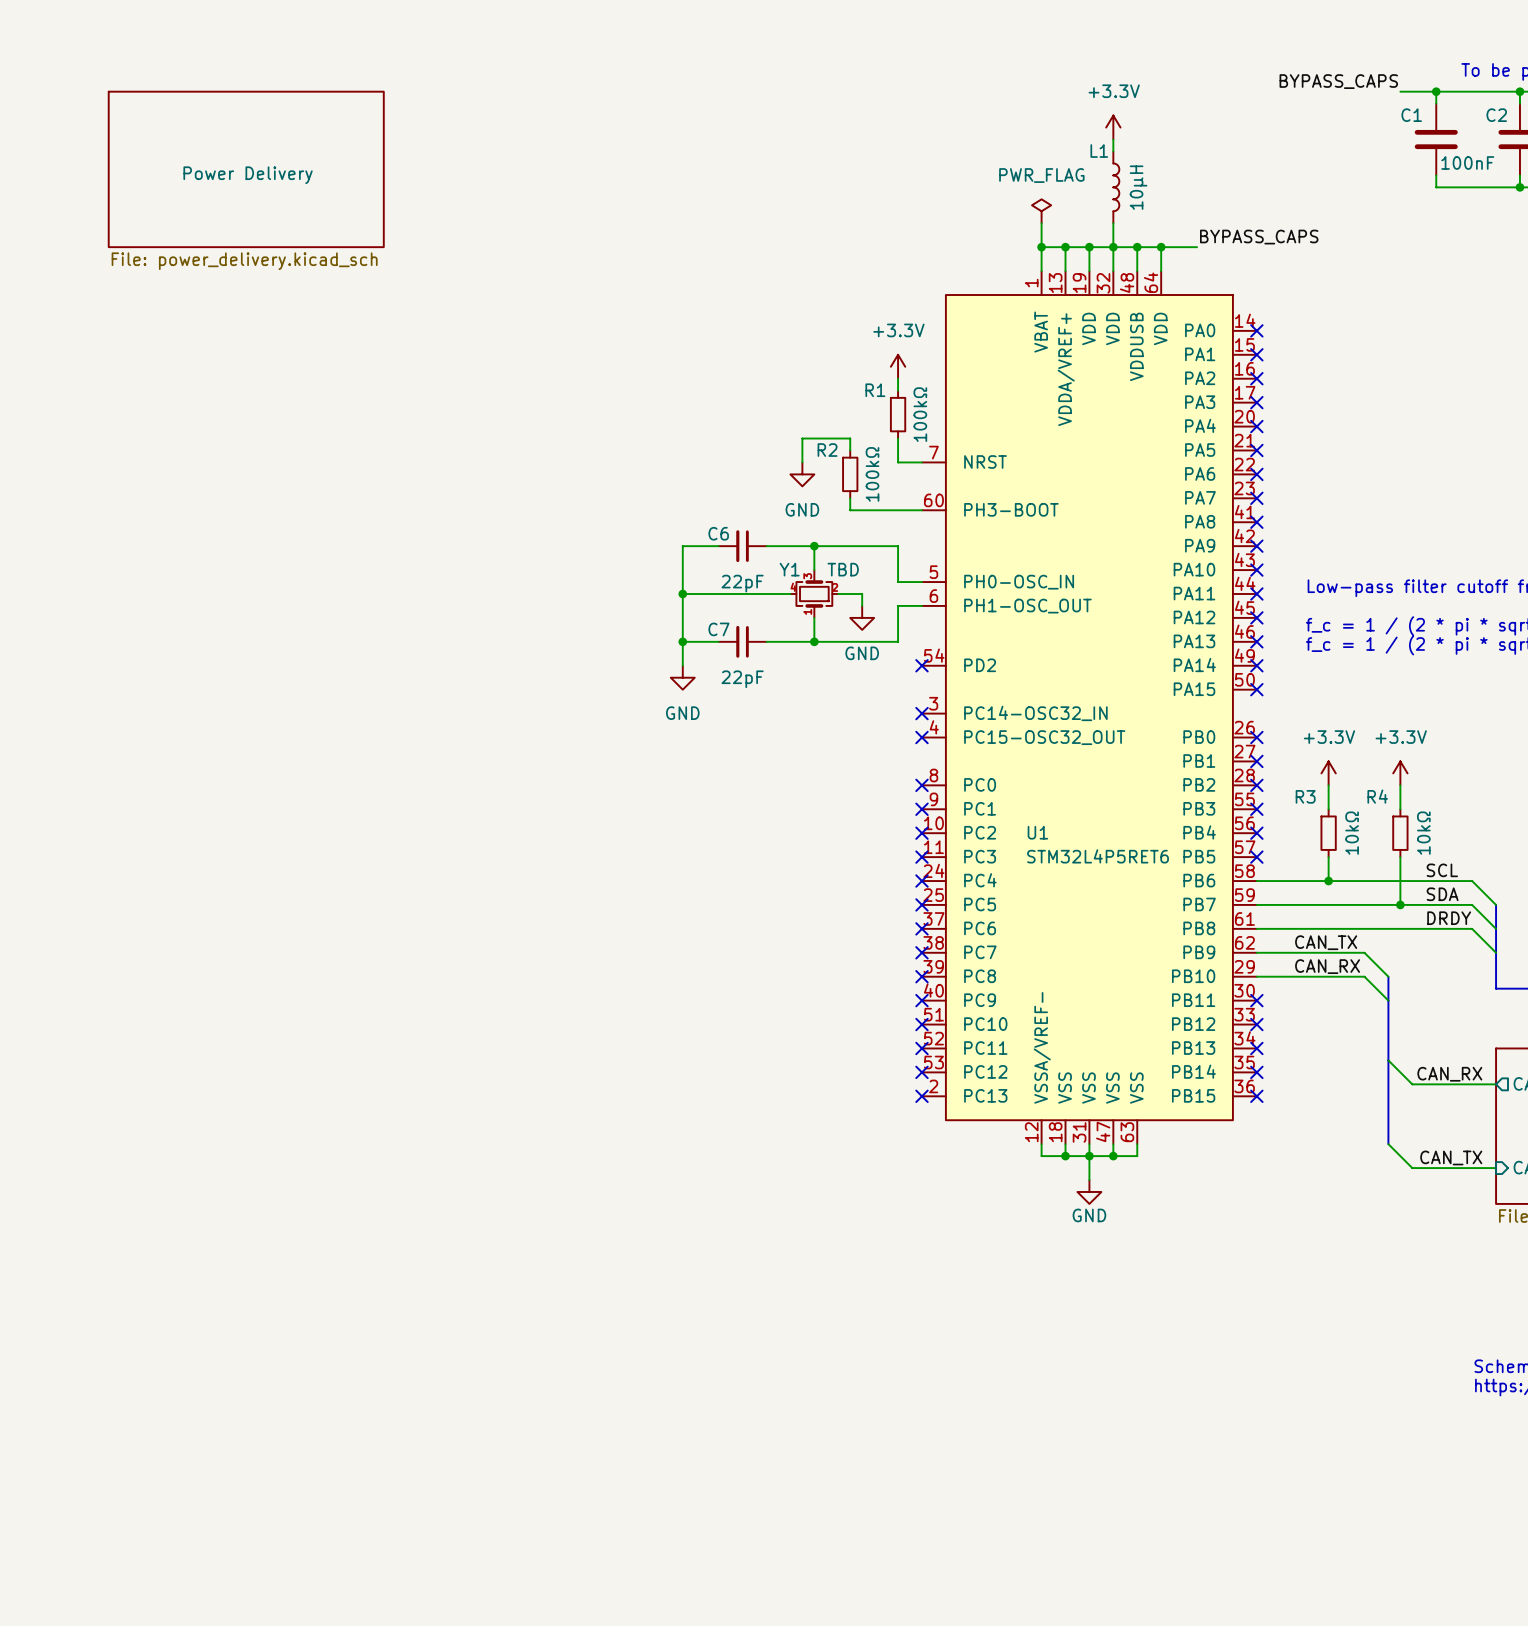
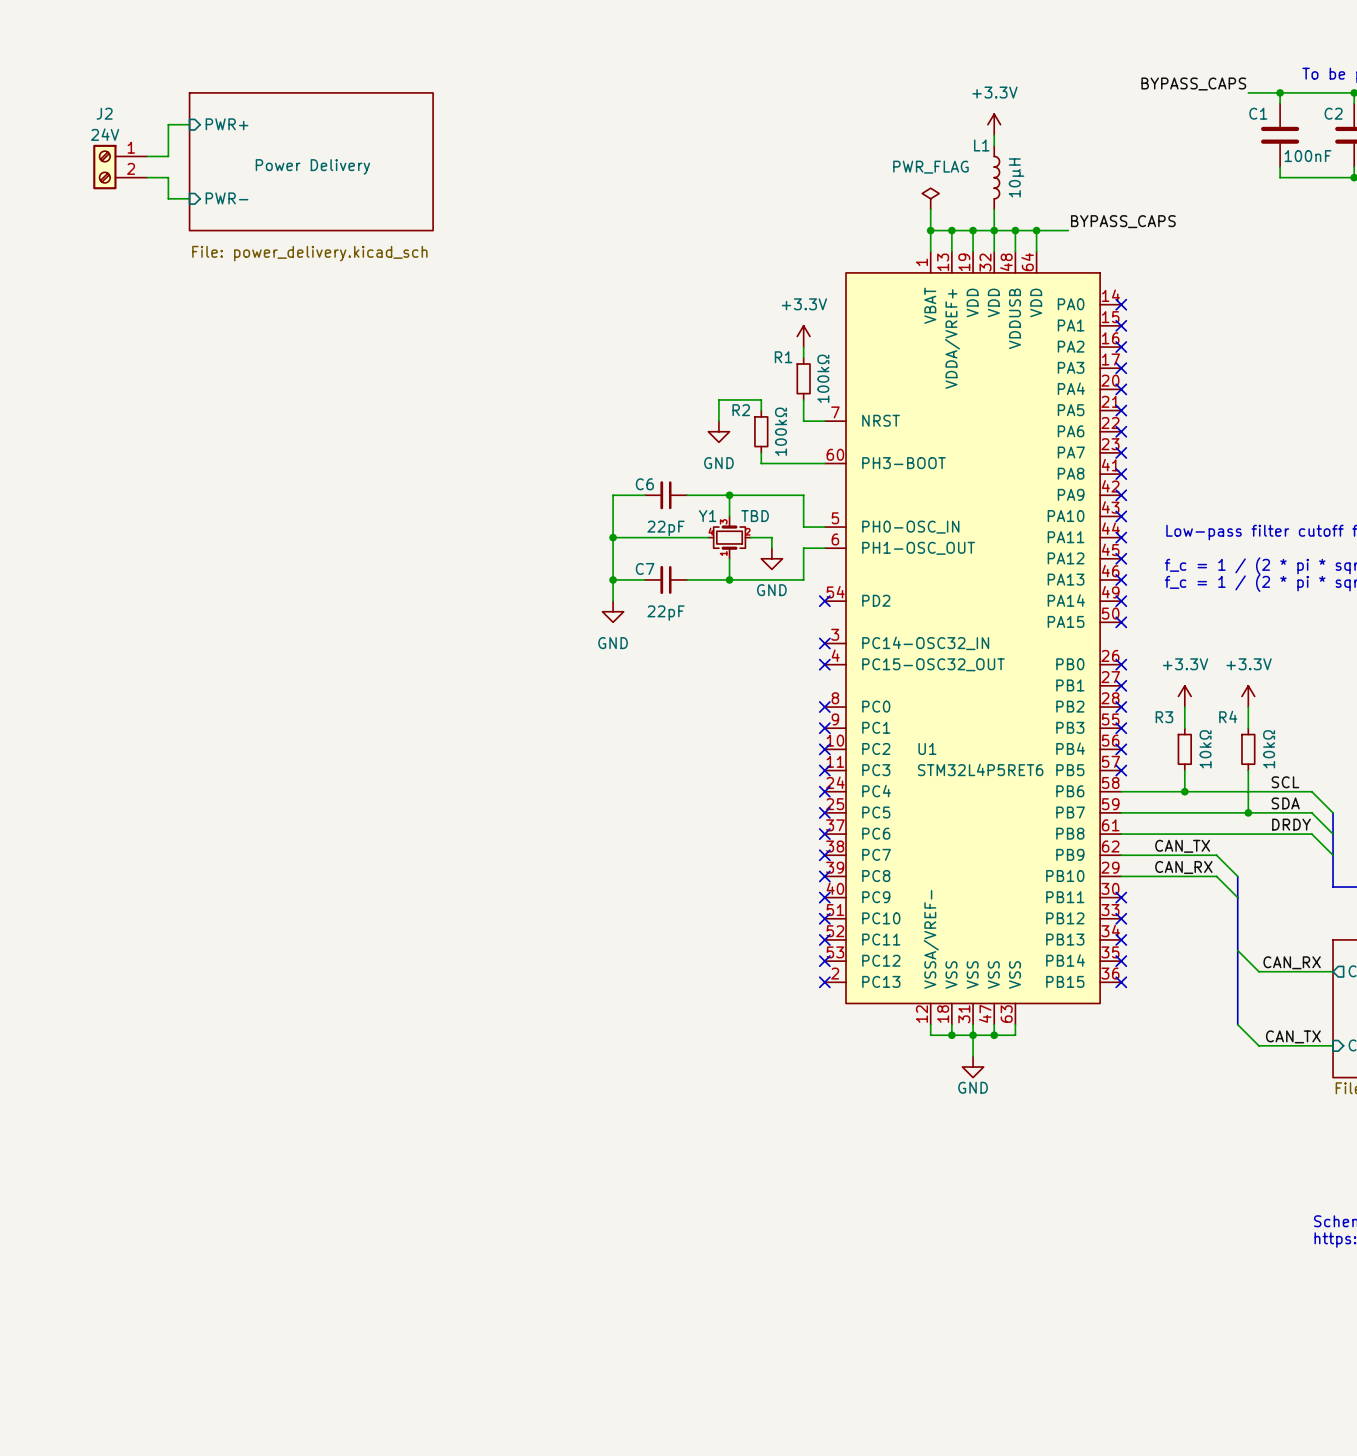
wire: none -> (189, 124) (168, 124) (168, 156) (147, 156)
sheet pin: none -> PWR+ (227, 124)
sheet Power Delivery position: (246, 169) -> (311, 161)
J2: none -> 24V (120, 167)
wire: none -> (147, 177) (168, 177) (168, 198) (189, 198)
sheet pin: none -> PWR- (227, 198)
sheet Power Delivery value position: File: power_delivery.kicad_sch (244, 261) -> File: power_delivery.kicad_sch (309, 253)

